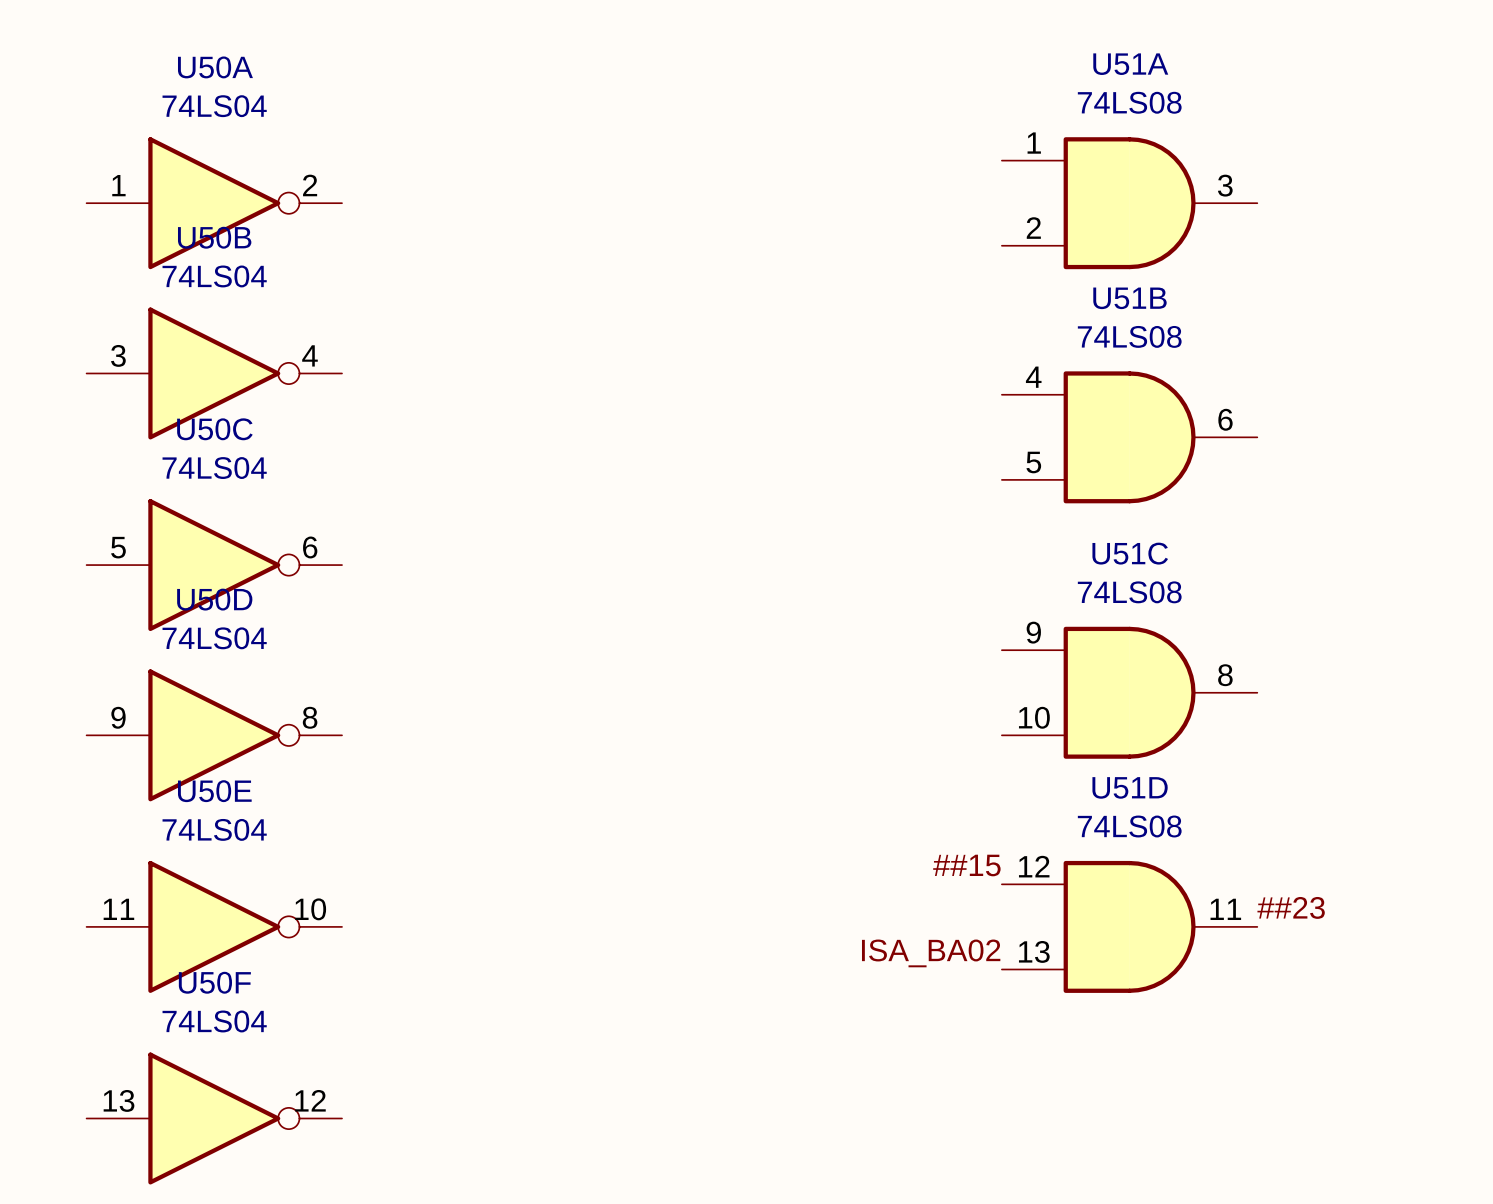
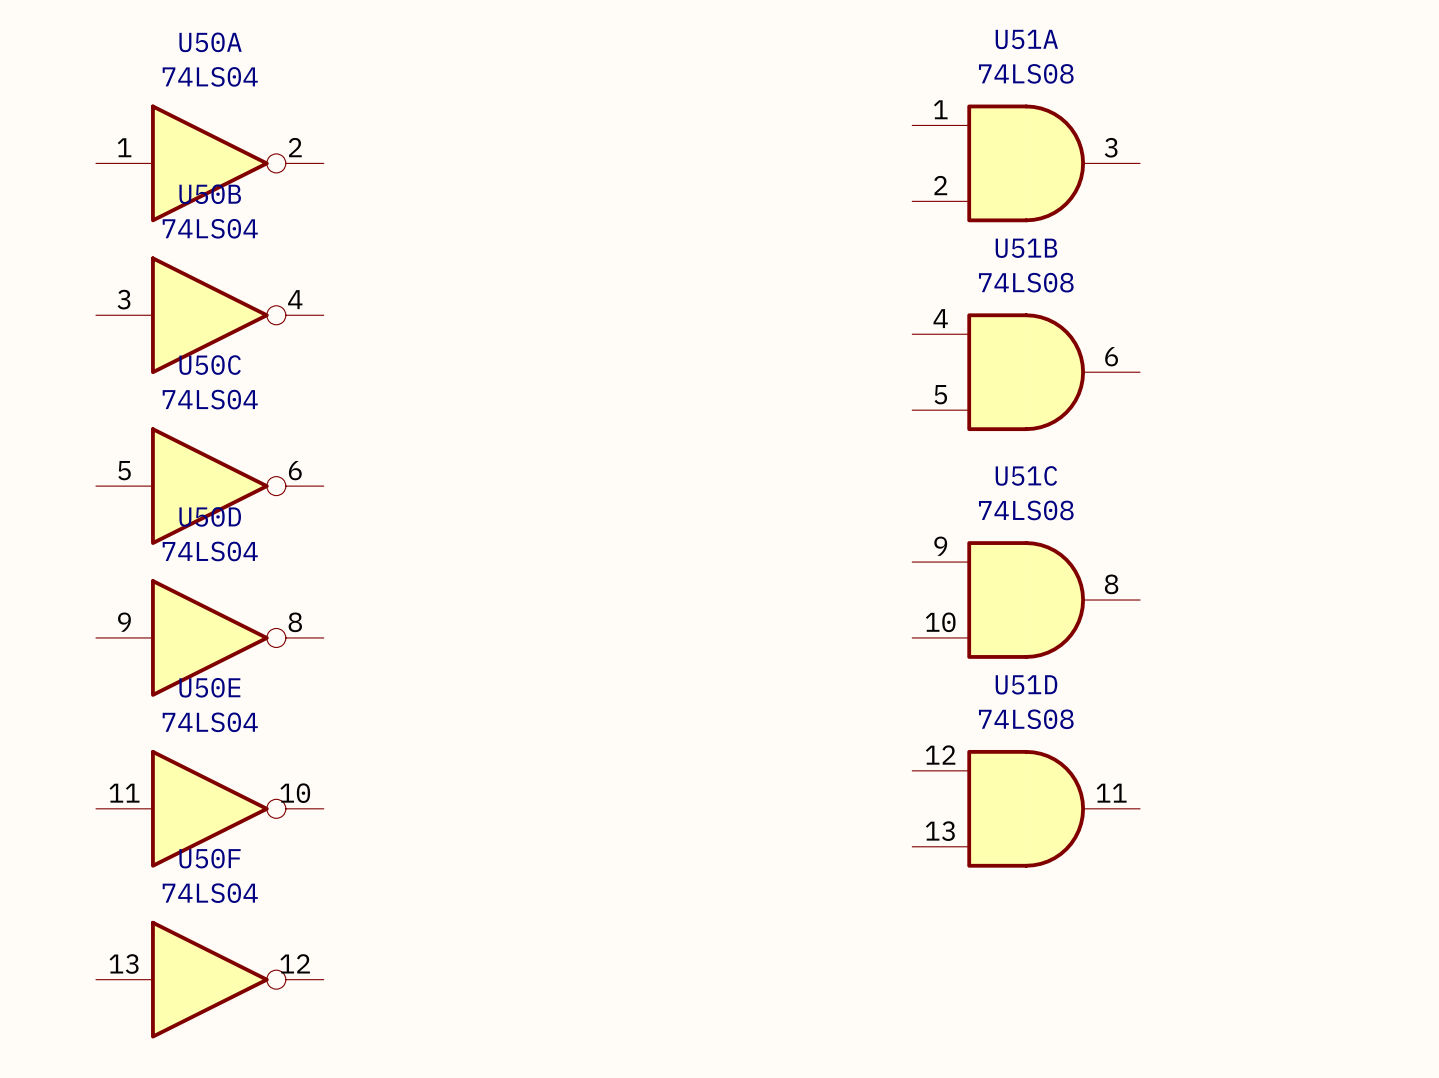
label: ##15 (966, 865) -> none
label: ##23 (1291, 907) -> none
label: ISA_BA02 (931, 953) -> none

